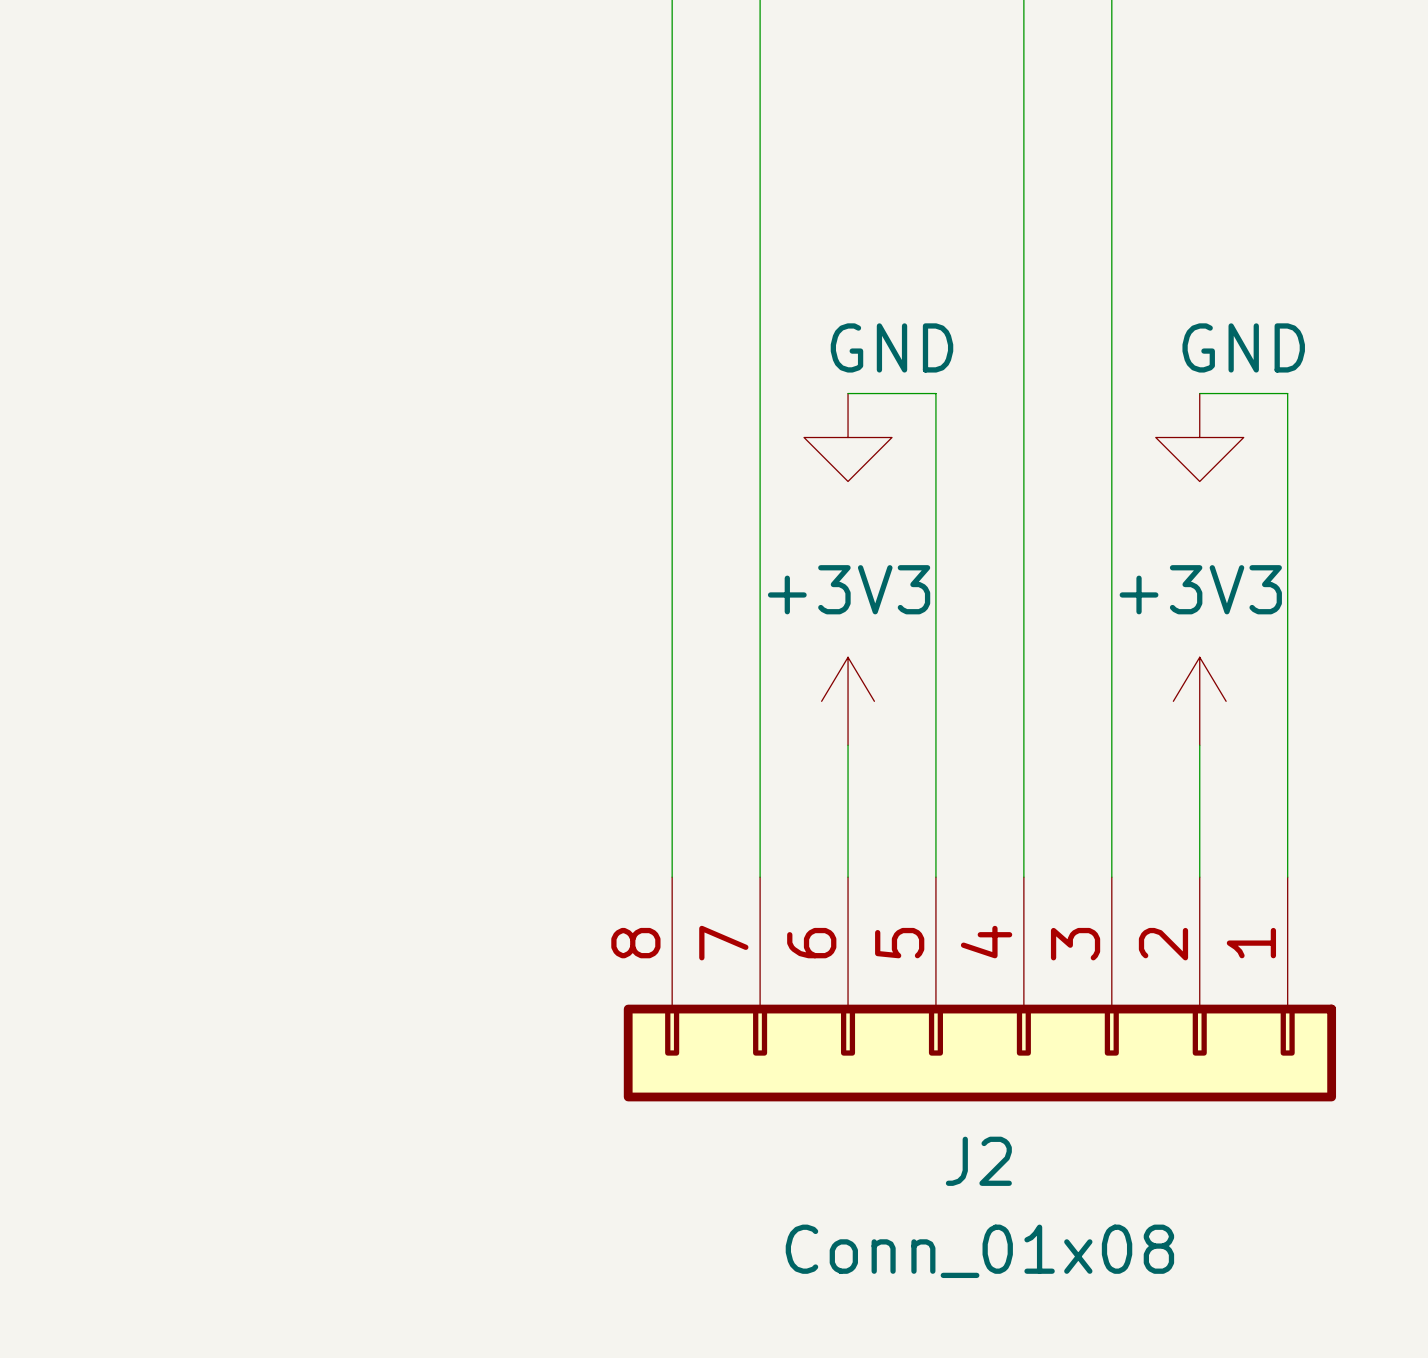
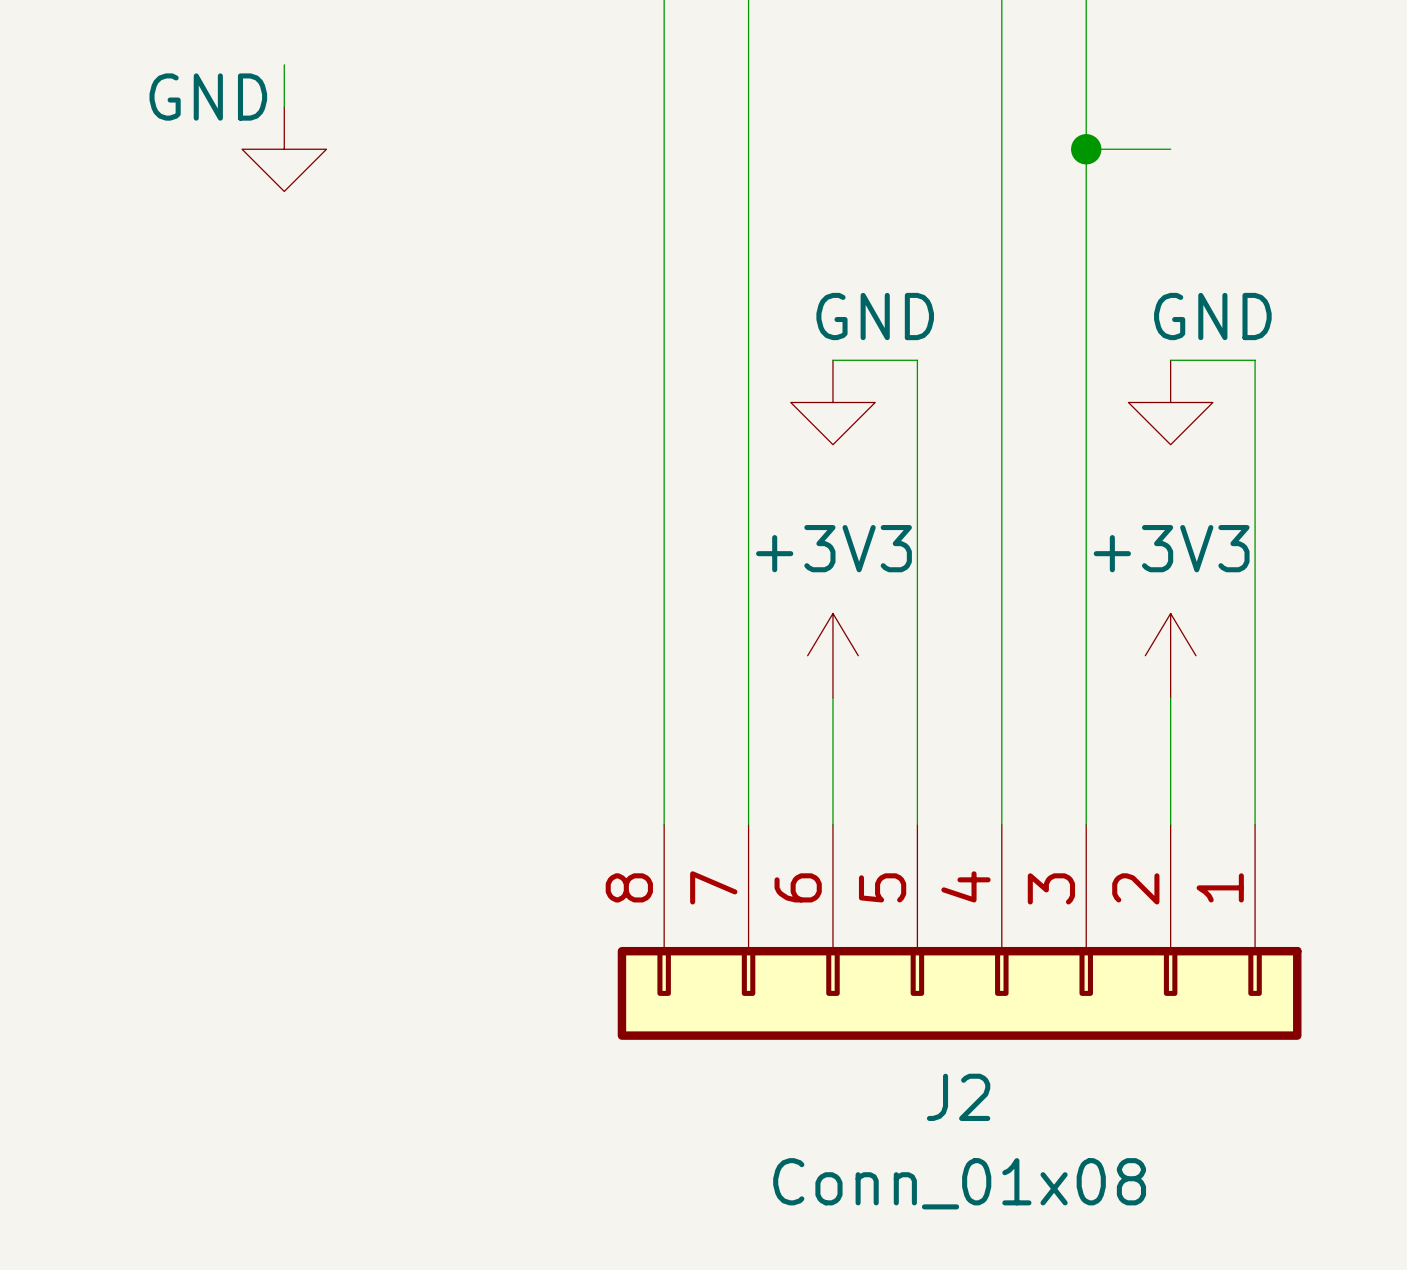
wire: none -> (284, 64) (284, 107)
power symbol: none -> GND (284, 149)
wire: none -> (1086, 149) (1170, 149)
junction: none -> (1086, 149)

